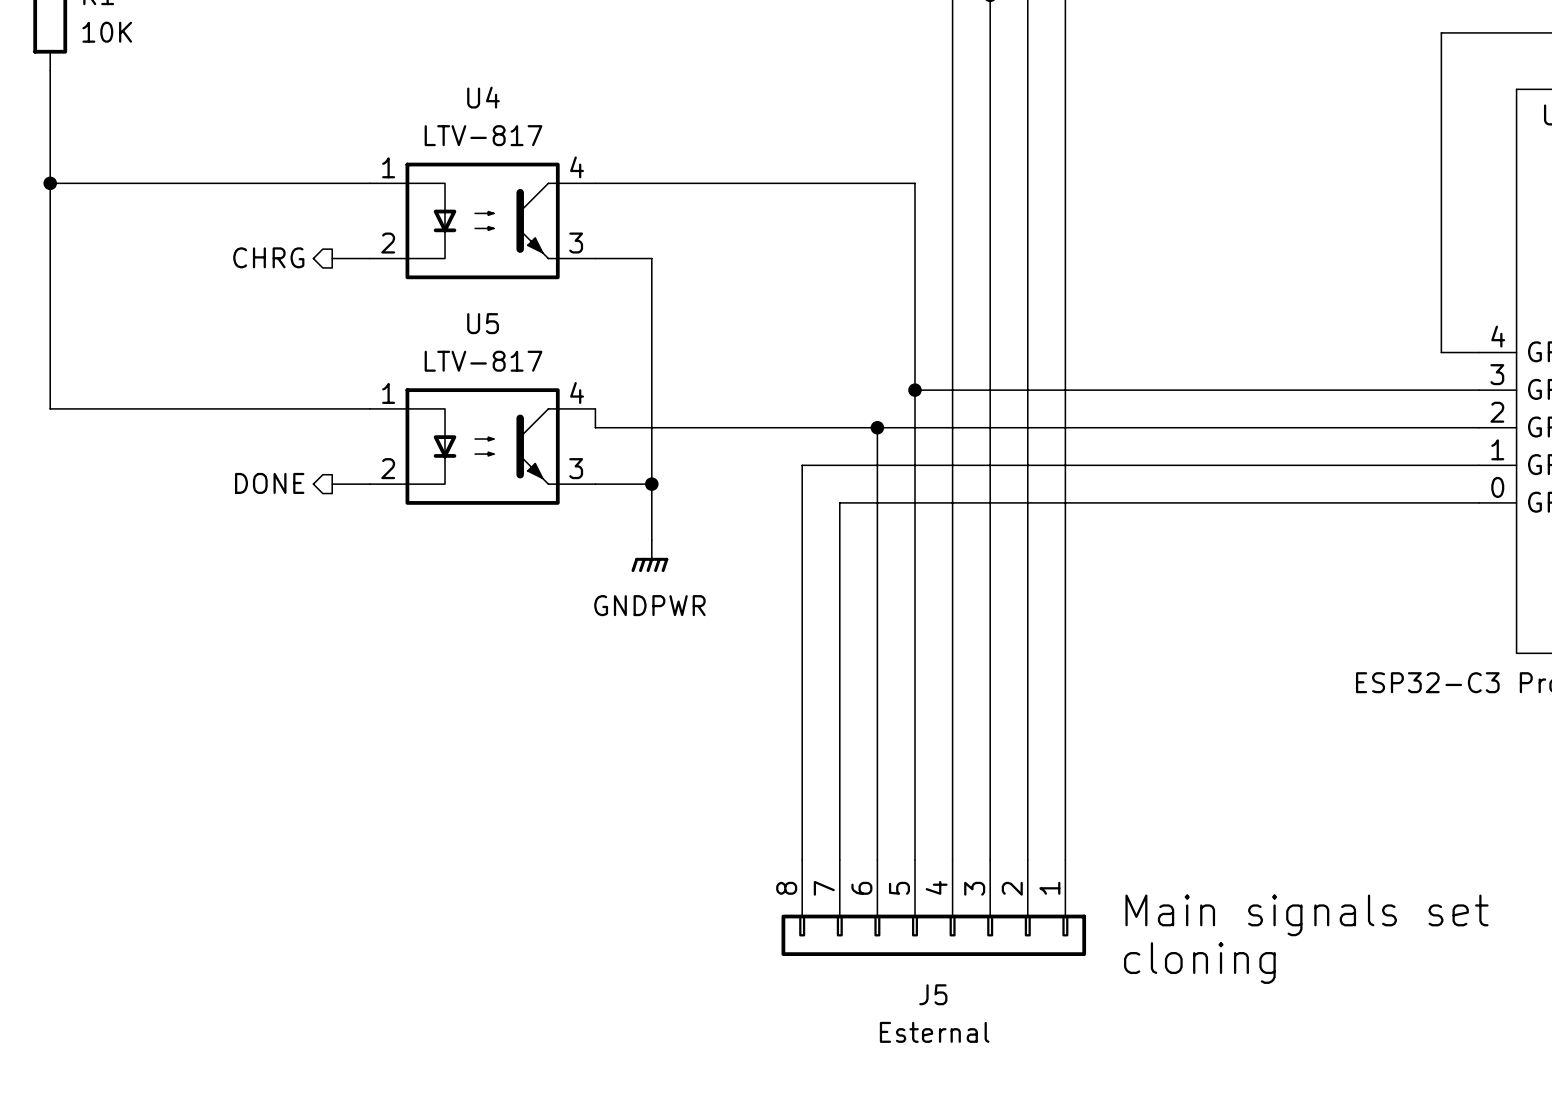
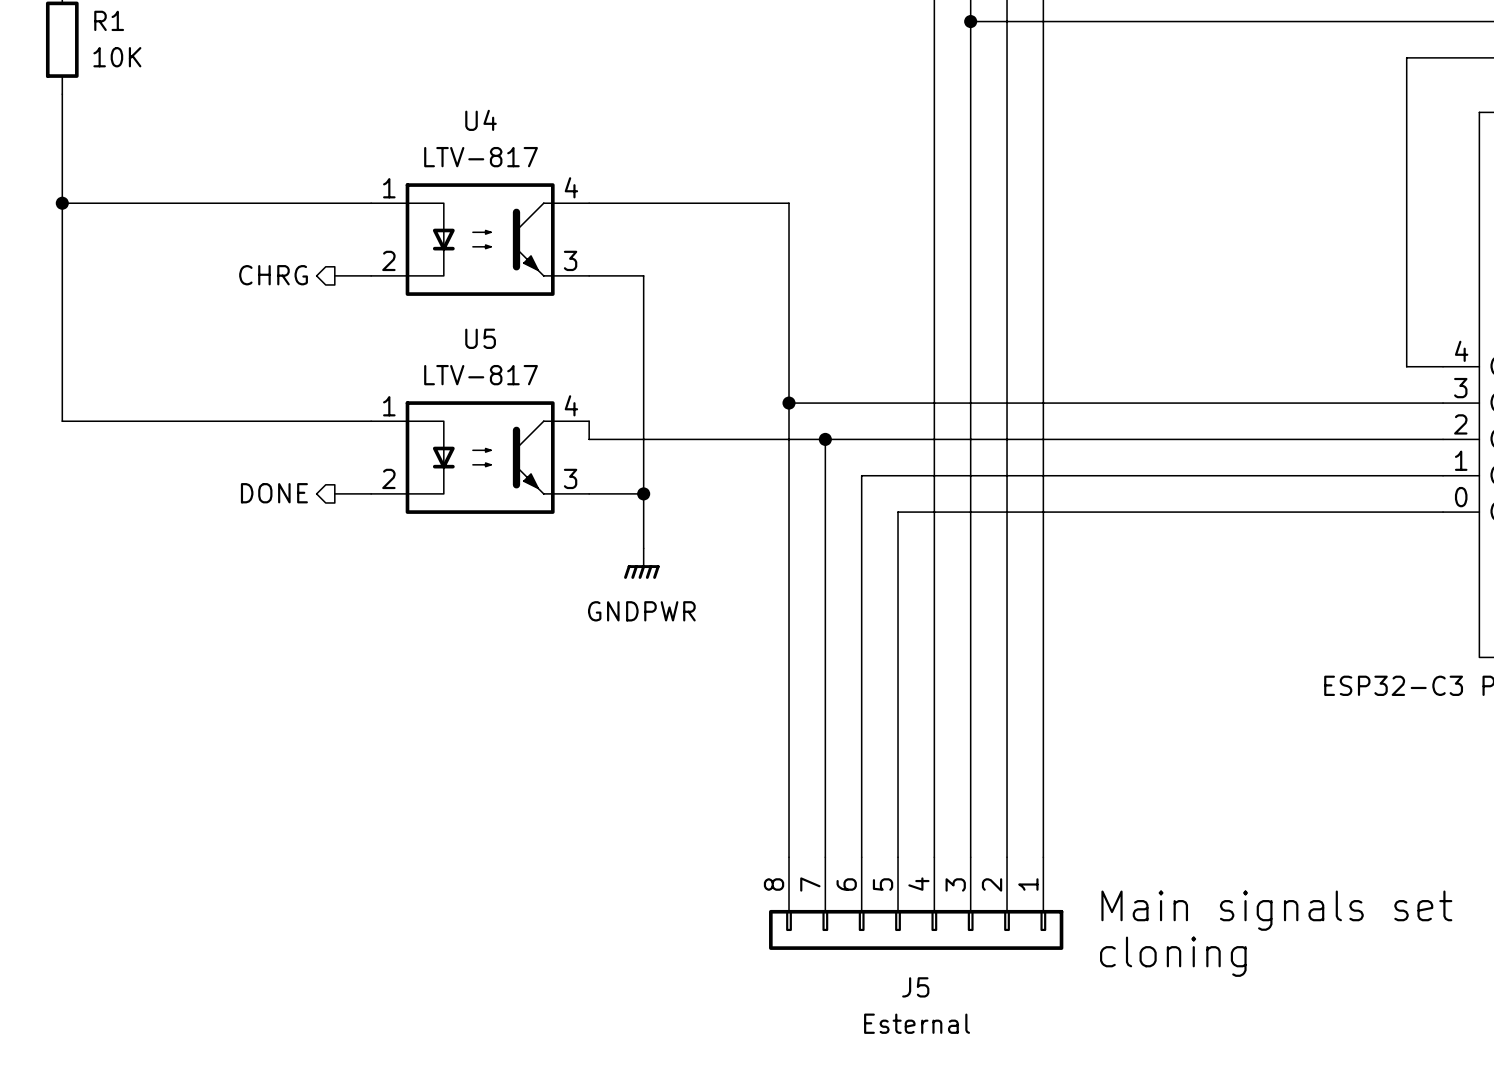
wire: (802, 183) (914, 183) (914, 502) (839, 502) -> (789, 203) (789, 475)
wire: none -> (789, 403) (898, 403)
junction: none -> (789, 403)
junction: (914, 390) -> none
wire: none -> (825, 439) (825, 512)
wire: (877, 427) (877, 465) (802, 465) -> none
junction position: (877, 427) -> (825, 439)

